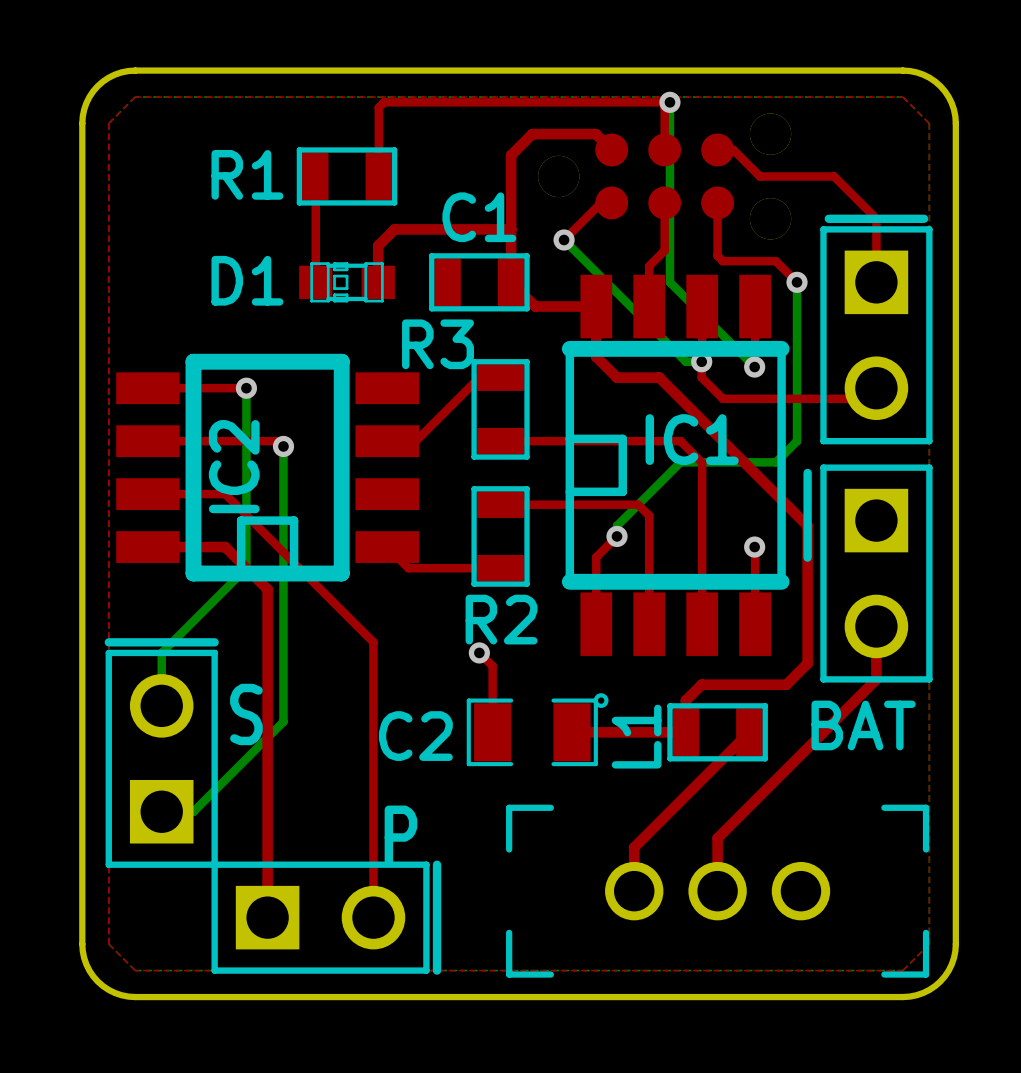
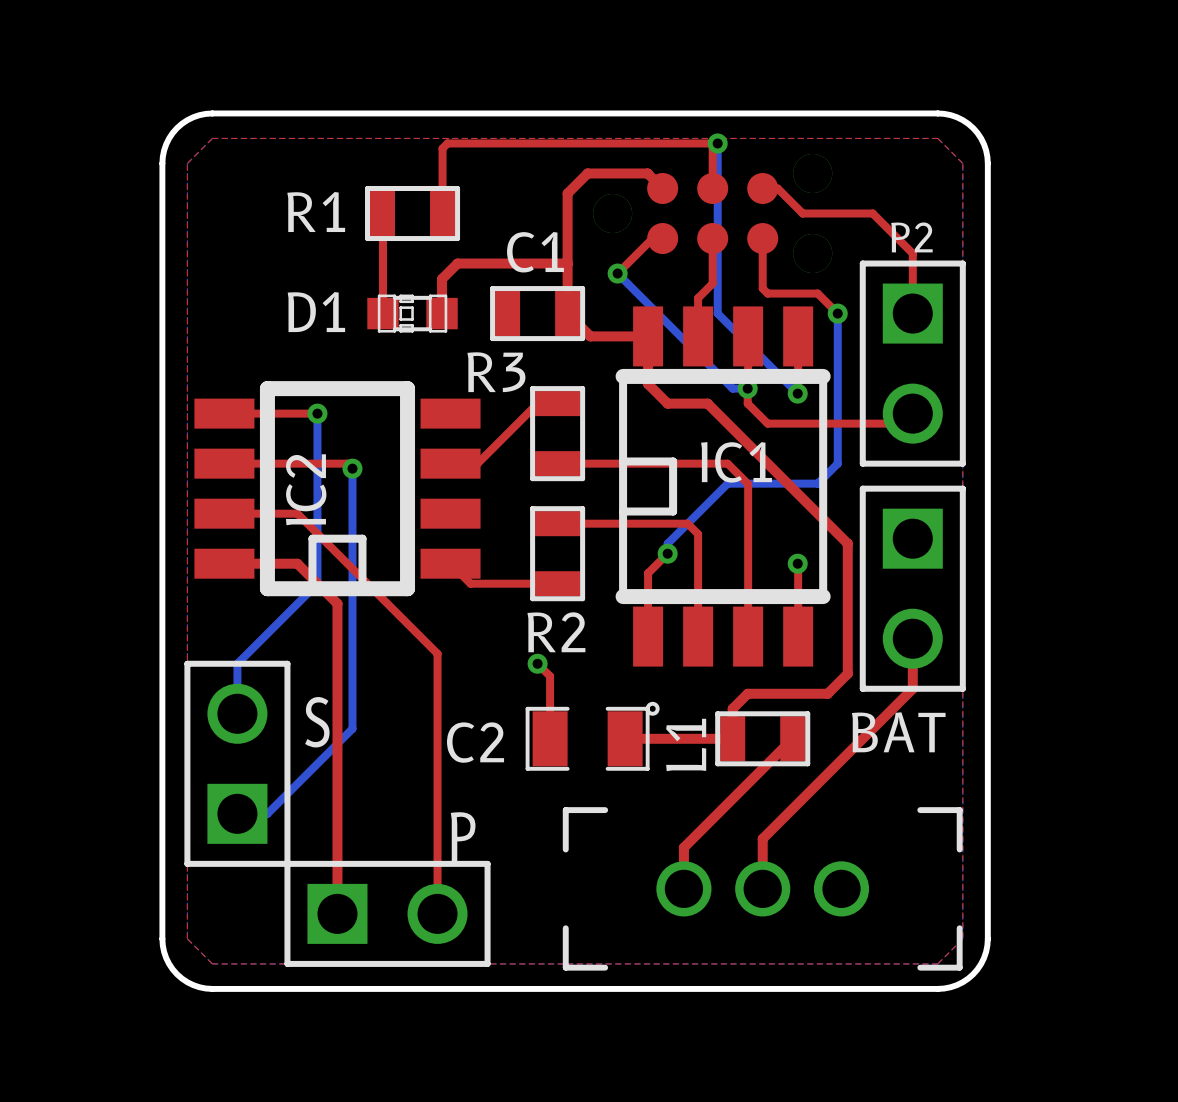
P2 name: none -> P2 (911, 237)
line: (828, 218) (924, 218) -> none
line: (807, 472) (807, 557) -> none
line: (108, 642) (214, 642) -> none
line: (437, 864) (437, 970) -> none

